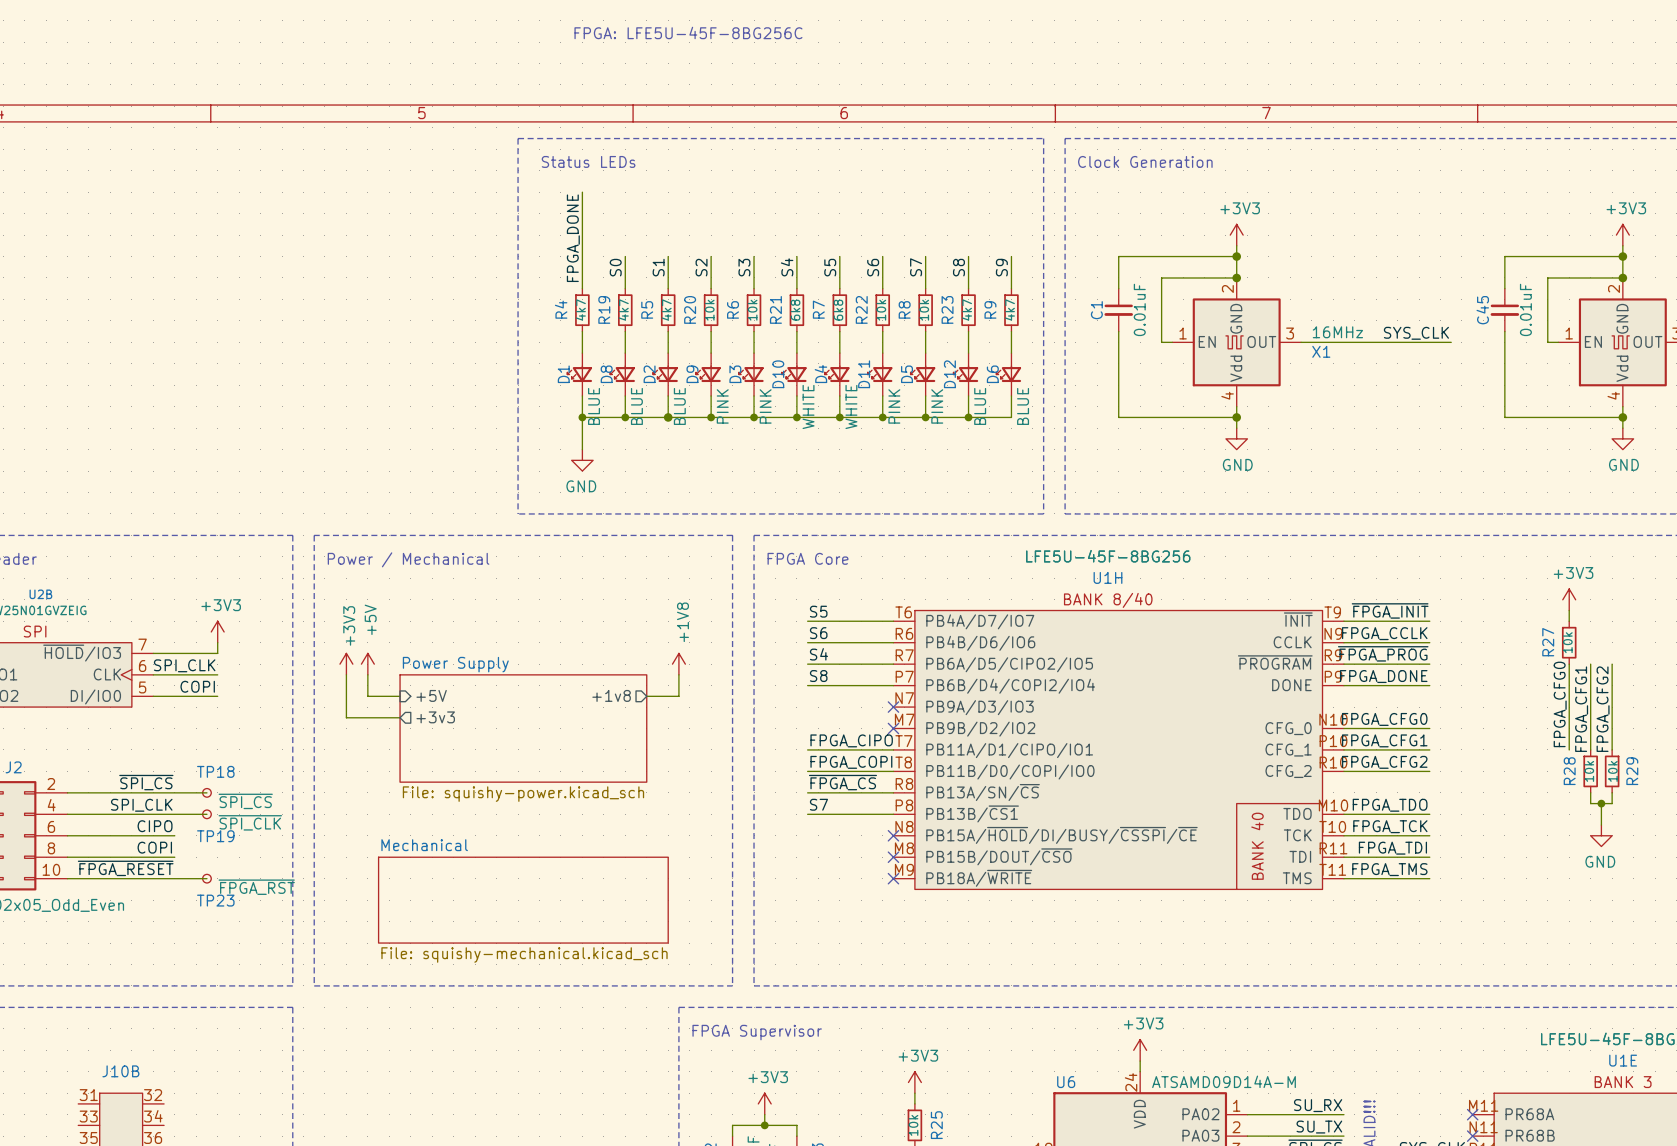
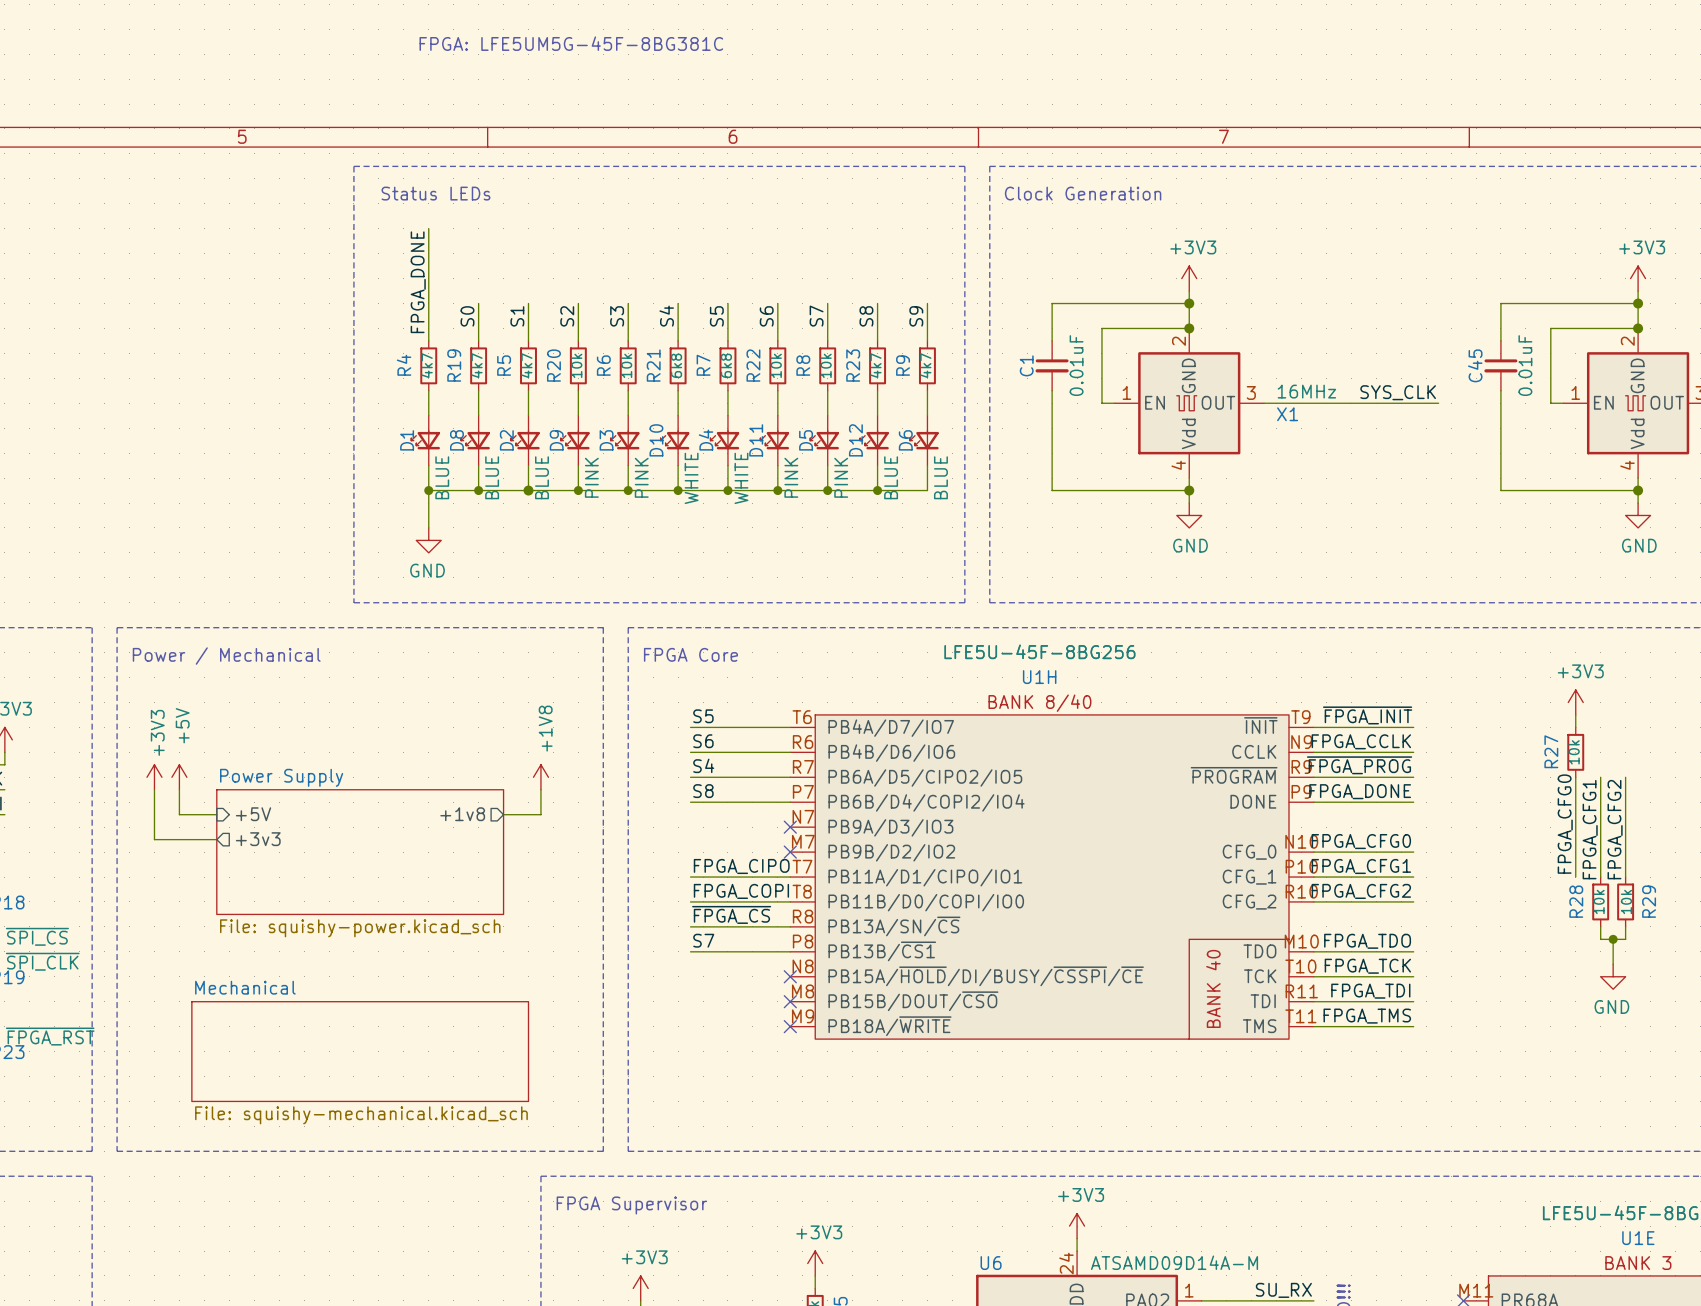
text: FPGA: LFE5U-45F-8BG256C (688, 32) -> FPGA: LFE5UM5G-45F-8BG381C (571, 43)

